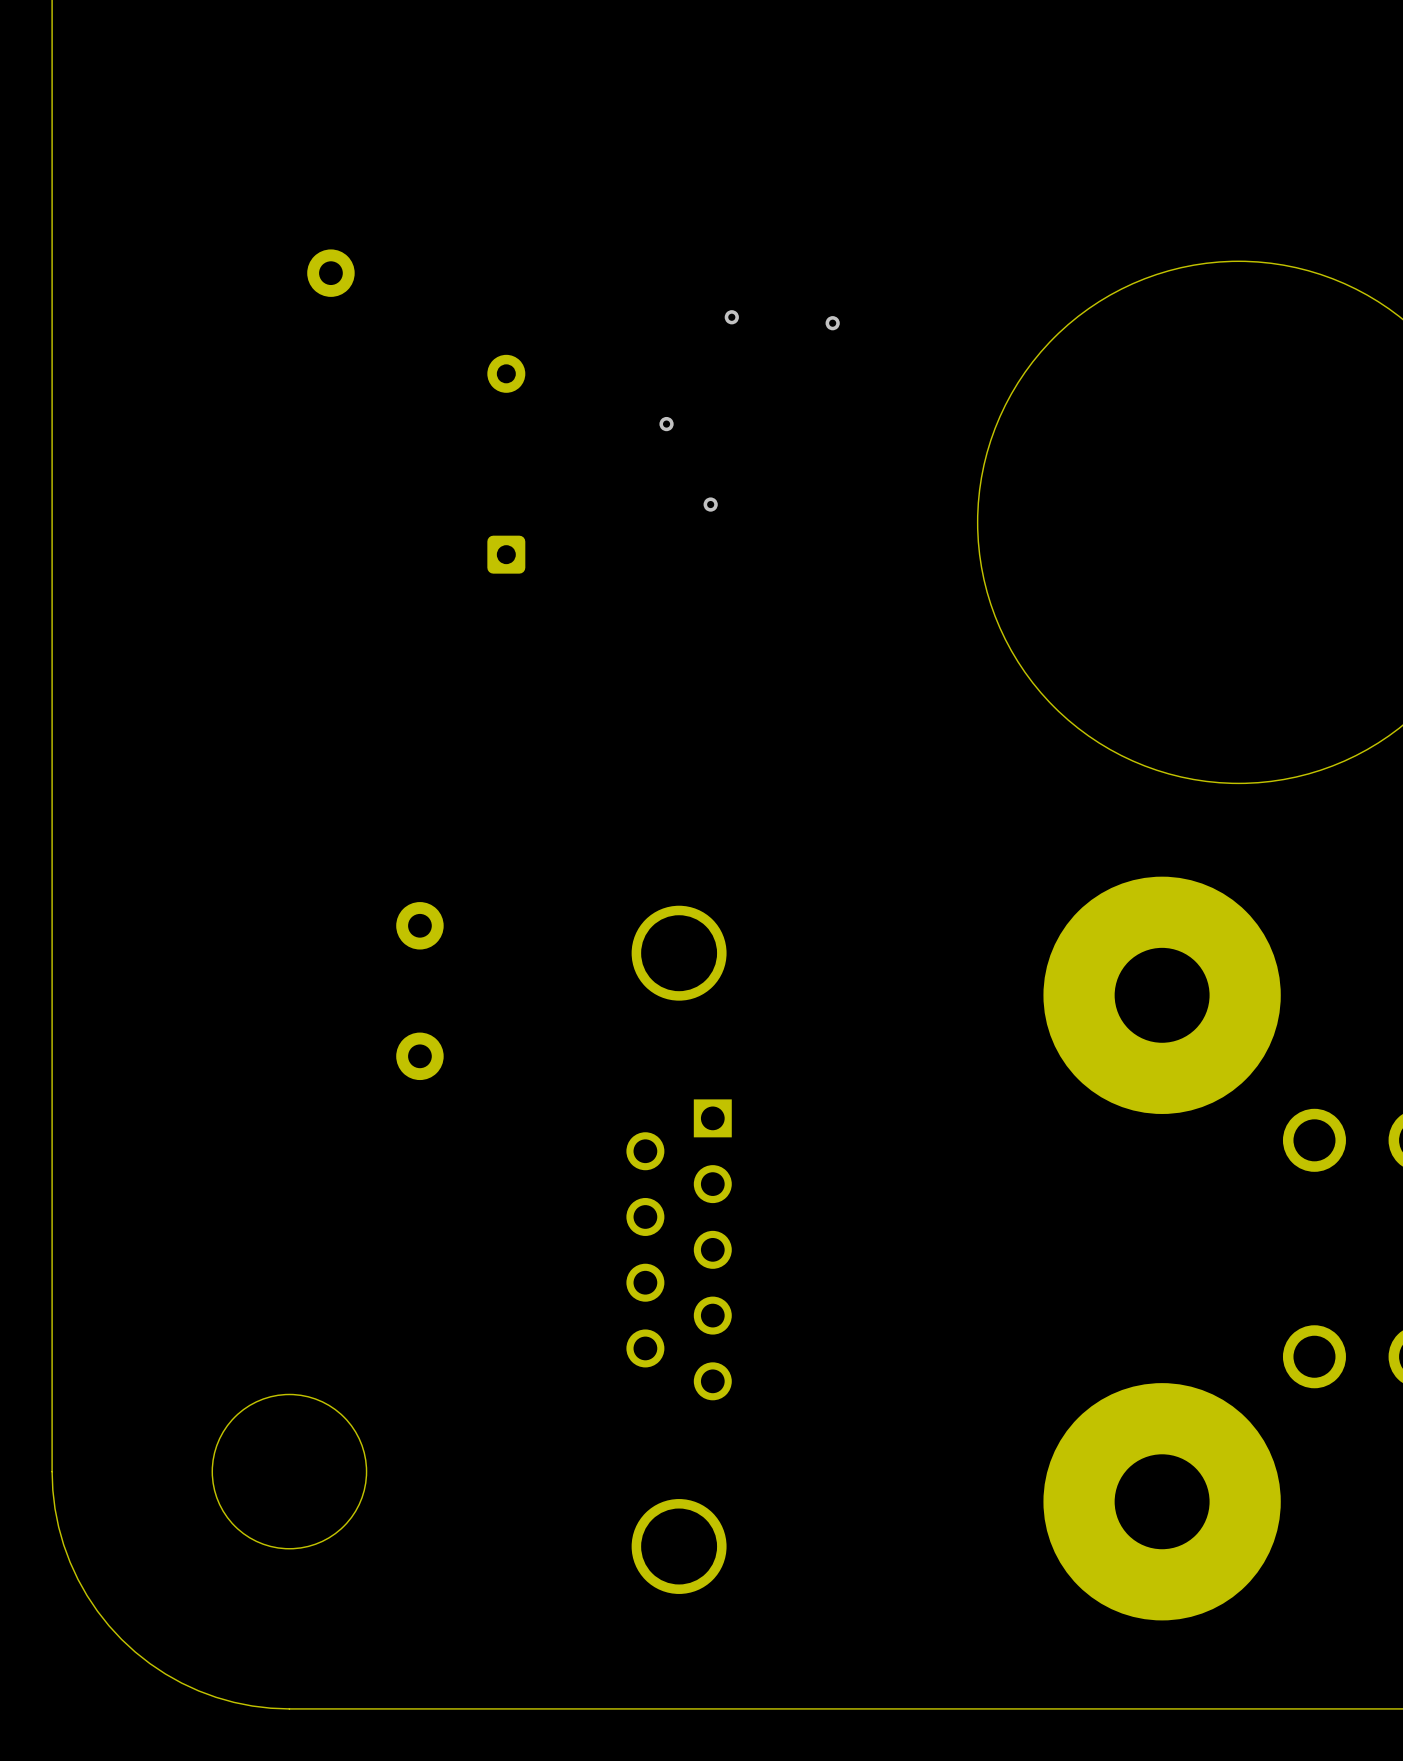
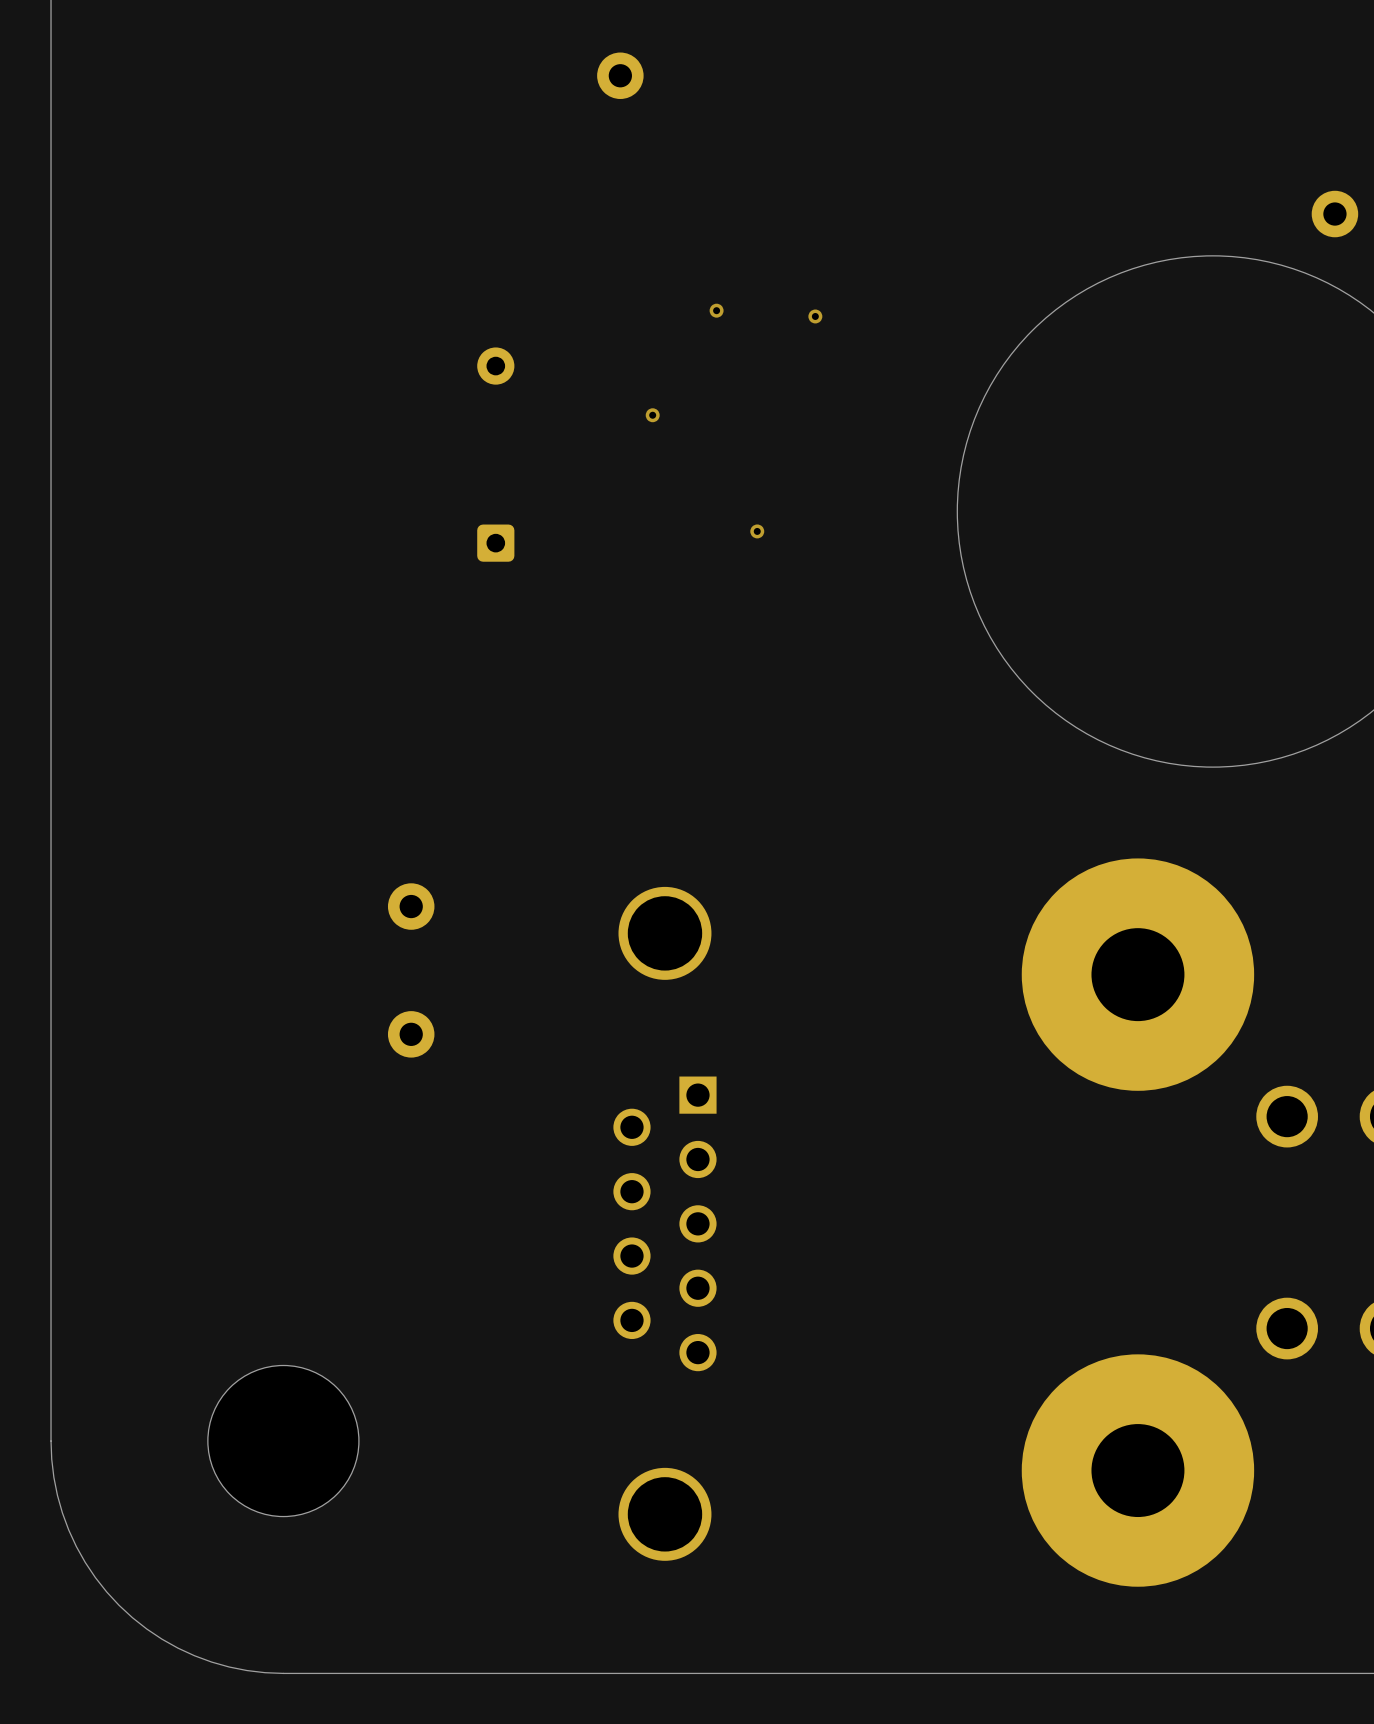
part: none -> (1334, 214)
part position: (330, 273) -> (620, 75)
via position: (710, 504) -> (757, 531)

